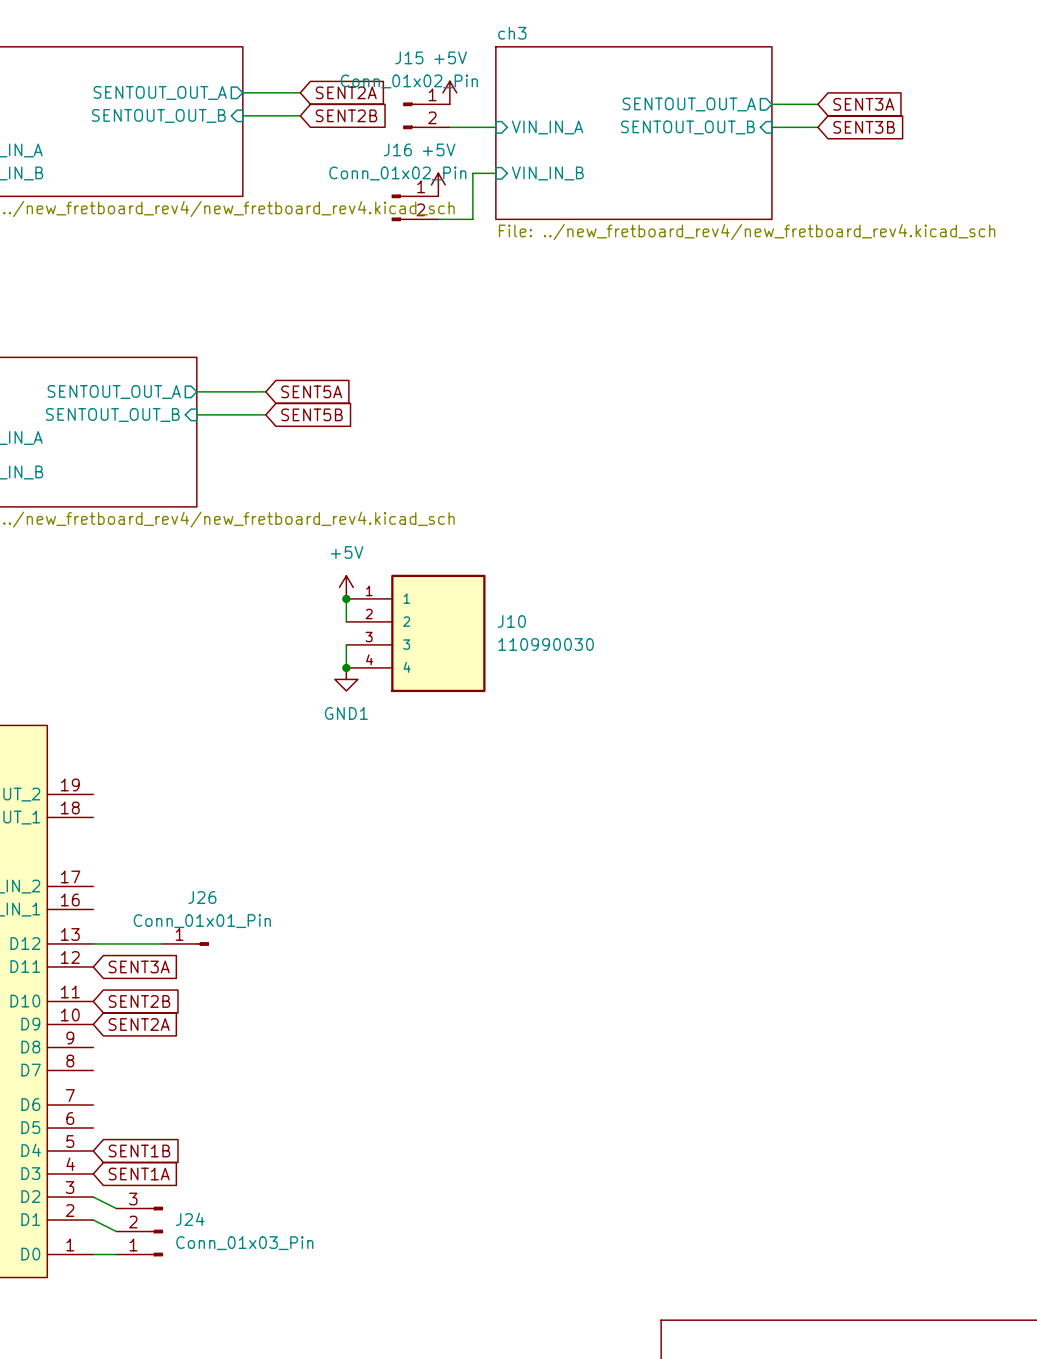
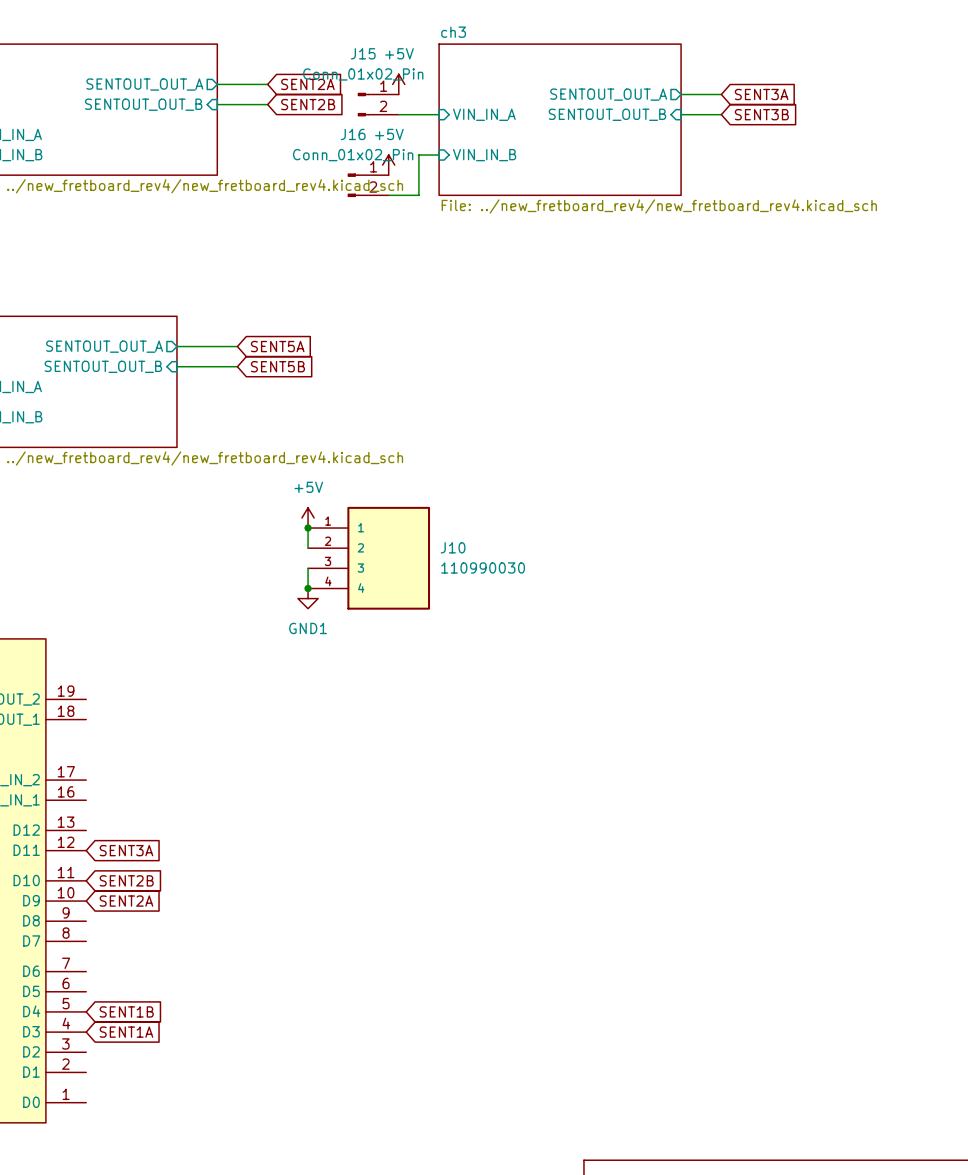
wire: (93, 943) (162, 943) -> none
J26: Conn_01x01_Pin (185, 943) -> none
wire: (93, 1197) (116, 1208) -> none
wire: (93, 1220) (116, 1231) -> none
J24: Conn_01x03_Pin (139, 1231) -> none
wire: (93, 1254) (116, 1254) -> none

